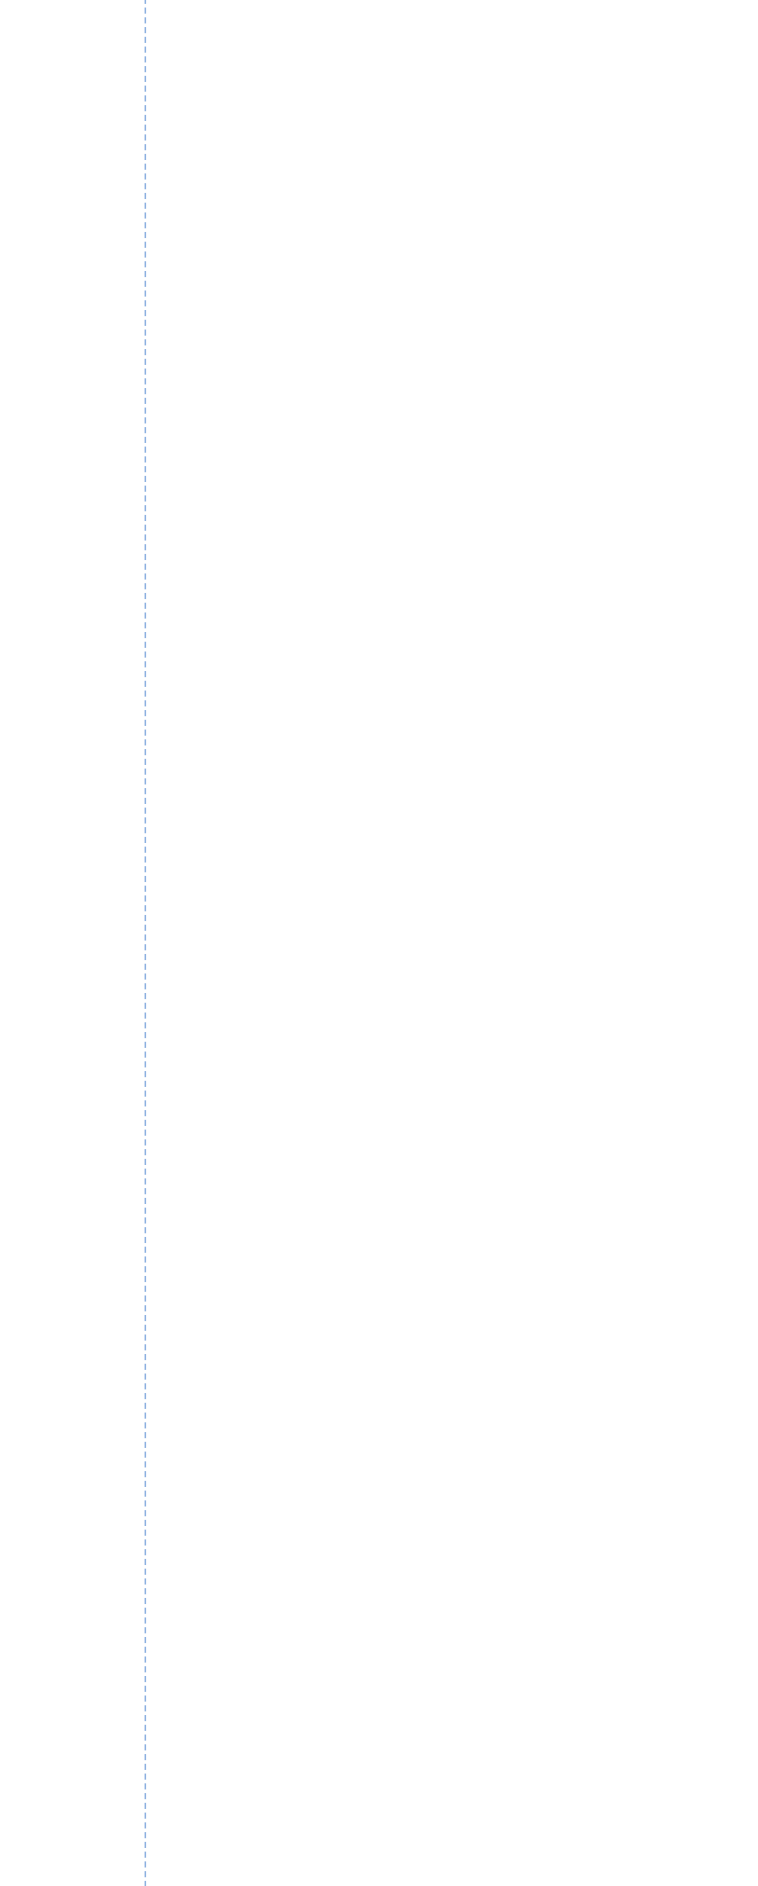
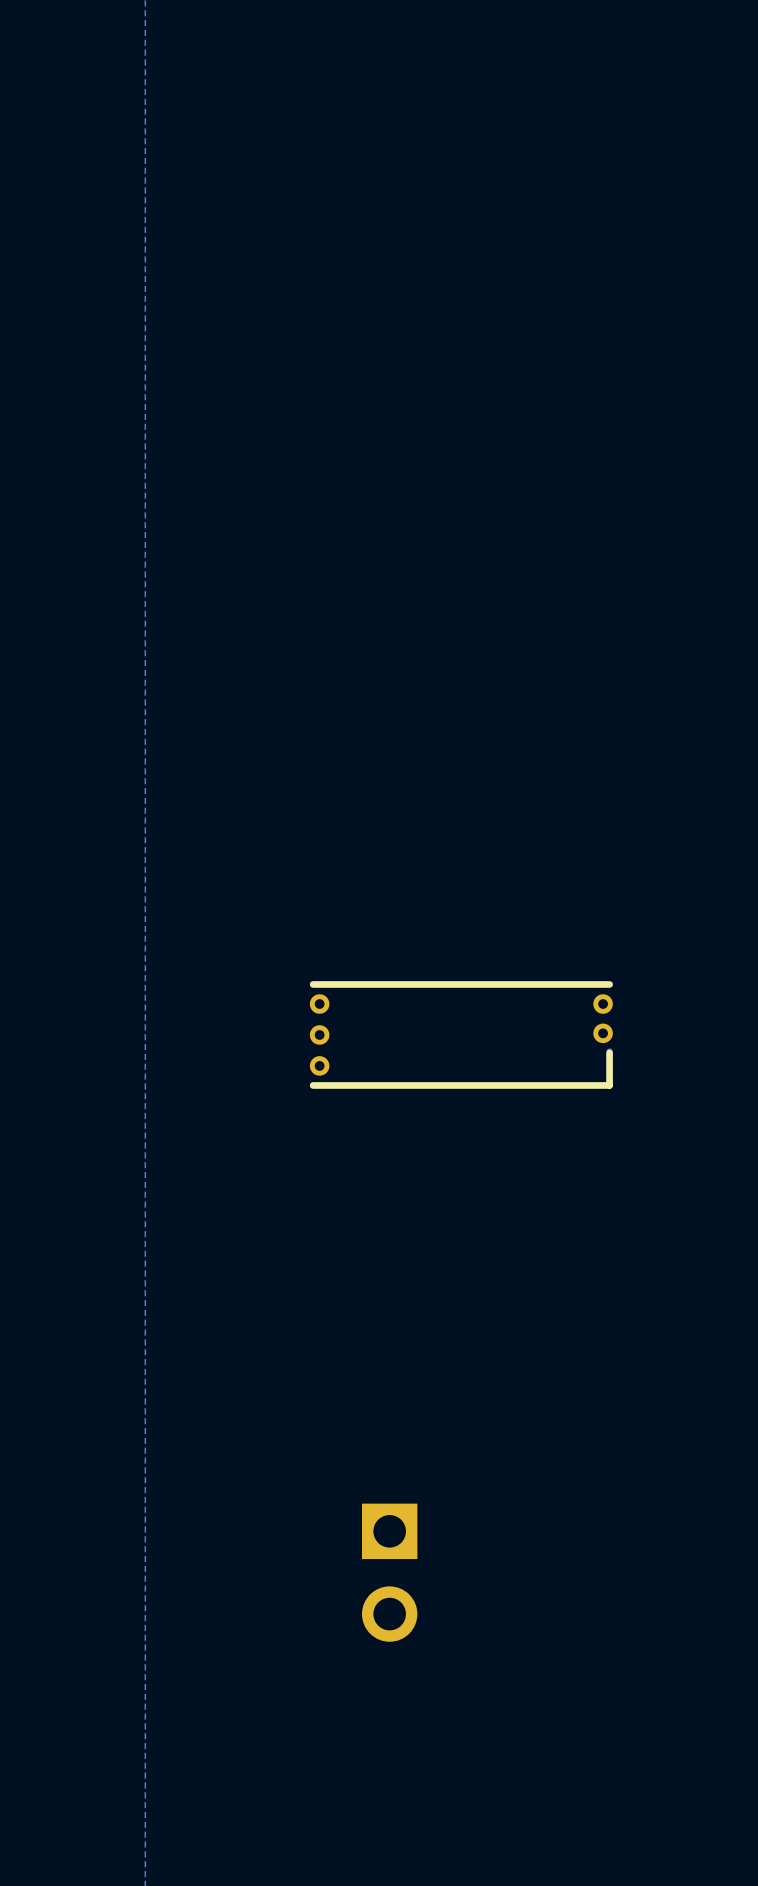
part: none -> (461, 1034)
part: none -> (389, 1572)

